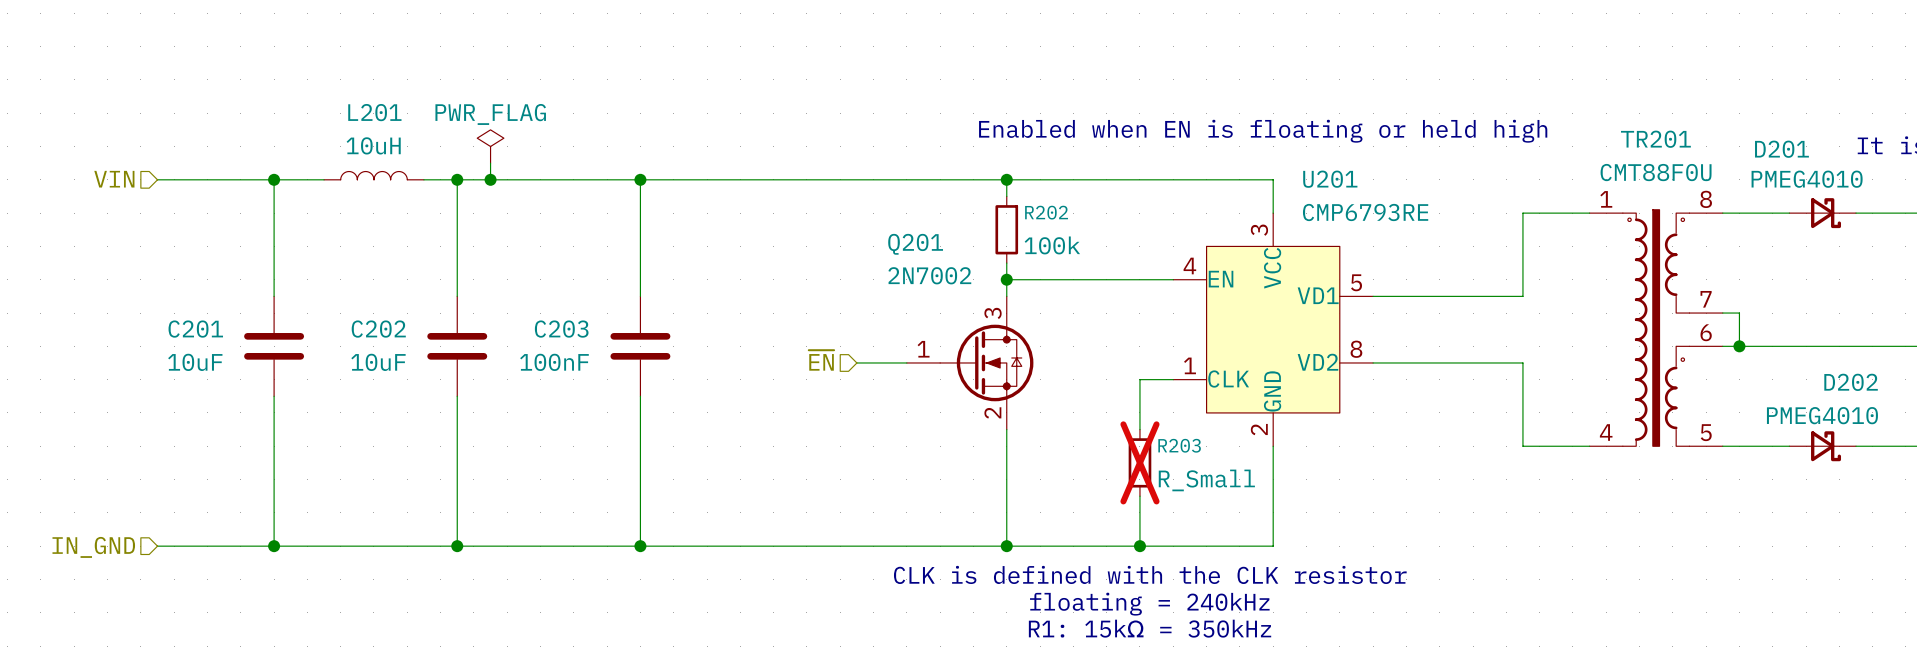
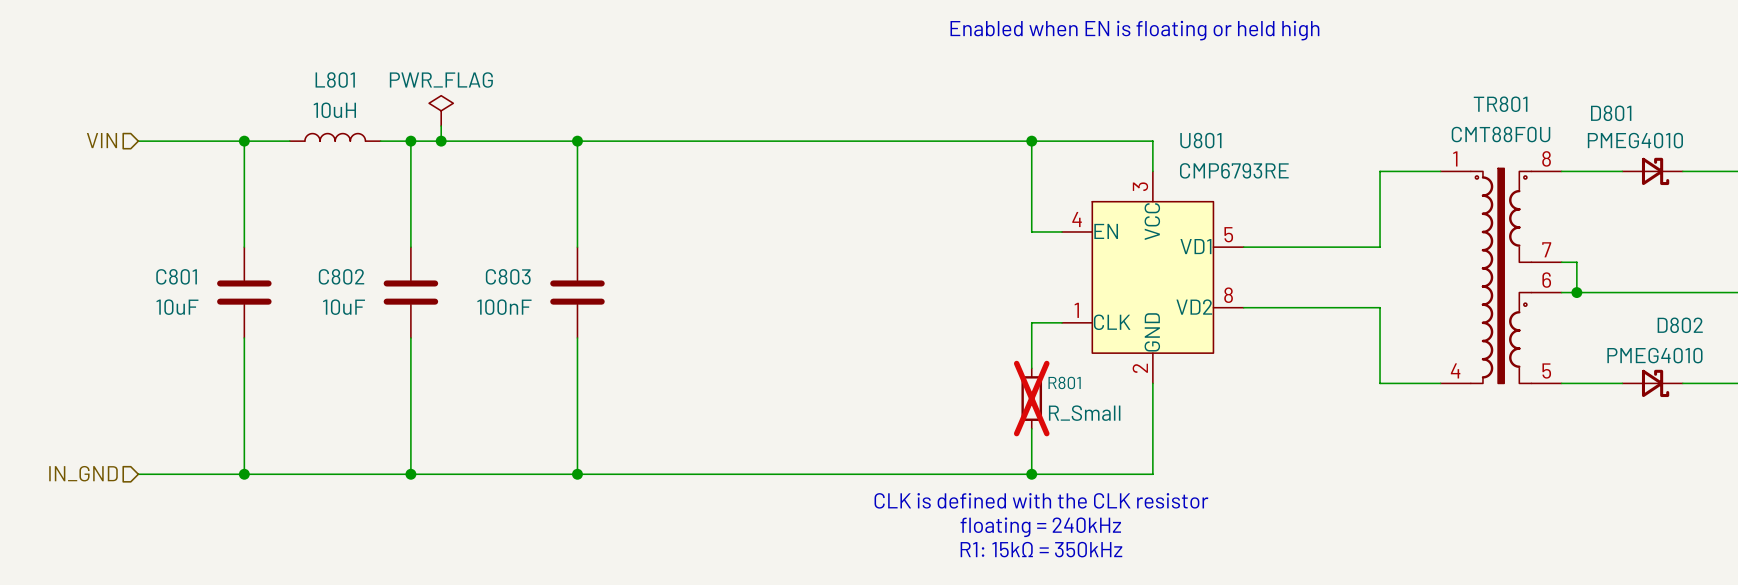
L201 name: L201 (374, 112) -> L801 (335, 80)
text position: Enabled when EN is floating or held high (1263, 131) -> Enabled when EN is floating or held high (1134, 30)
TR201 name: TR201 (1655, 139) -> TR801 (1500, 104)
D201 name: D201 (1781, 149) -> D801 (1611, 113)
wire: (1006, 179) (1006, 196) -> none
junction: (1006, 179) -> none
junction: none -> (1031, 141)
U201 name: U201 (1330, 179) -> U801 (1200, 140)
R202: 100k (1006, 229) -> none
wire: (1006, 263) (1006, 296) -> none
wire: (1006, 279) (1139, 279) -> (1031, 141) (1031, 231)
junction: (1006, 279) -> none
C201 name: C201 (195, 329) -> C801 (176, 276)
C202 name: C202 (378, 329) -> C802 (341, 276)
C203 name: C203 (561, 329) -> C803 (508, 276)
hierarchical label: ~{EN} (821, 360) -> none
wire: (856, 362) (906, 362) -> none
Q201: 2N7002 (970, 362) -> none
D202 name: D202 (1851, 382) -> D802 (1680, 325)
wire: (1006, 429) (1006, 546) -> none
R203 name: R203 (1179, 445) -> R801 (1064, 382)
junction: (1006, 546) -> none

